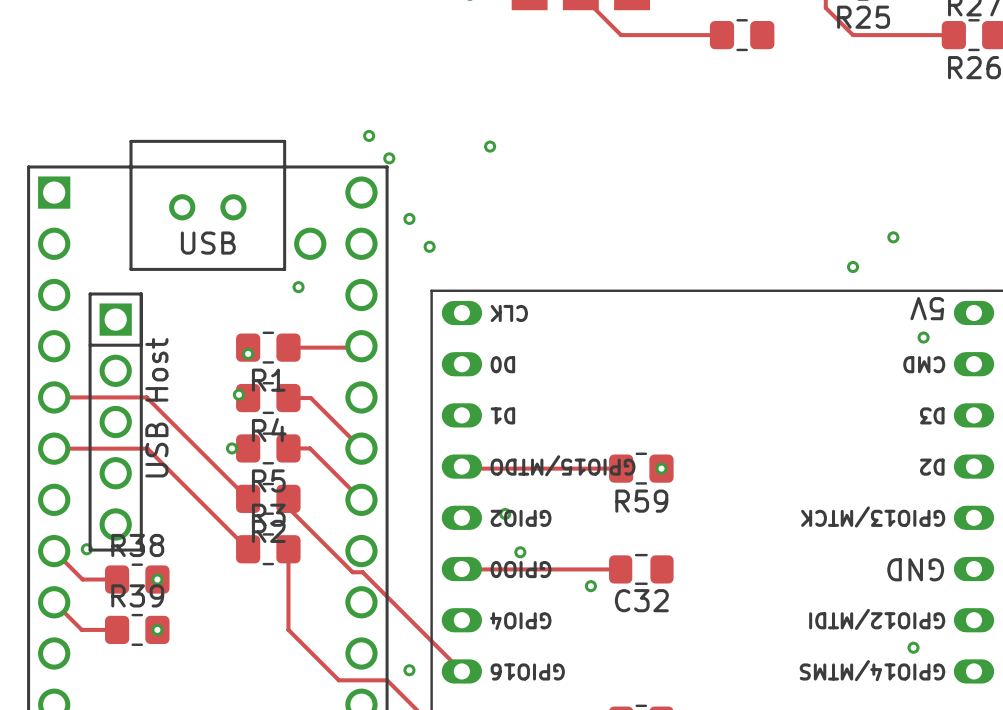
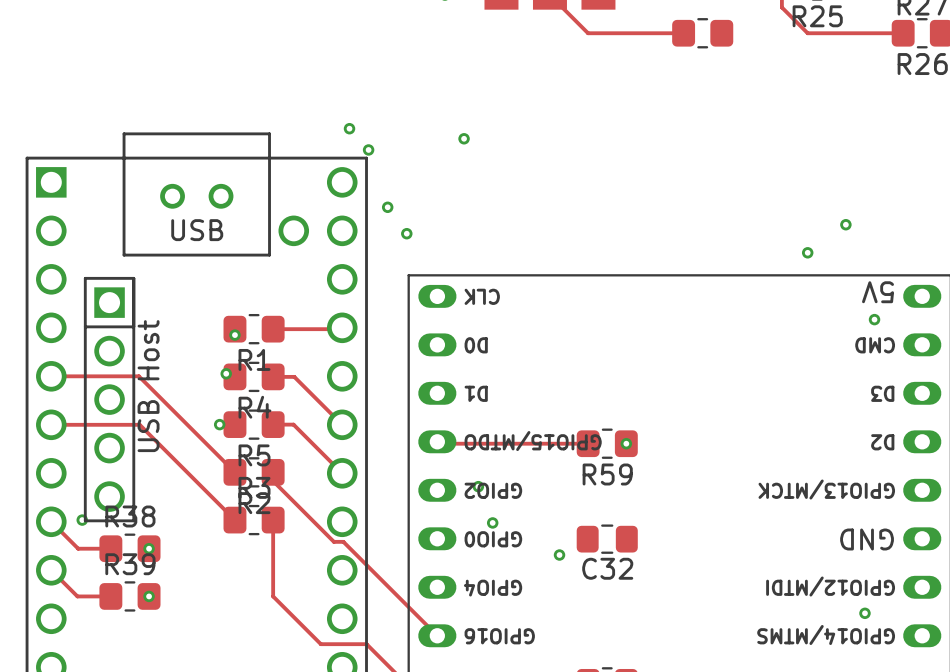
via: (298, 287) -> none
track: (461, 569) (620, 569) -> none
via: (409, 670) -> none

